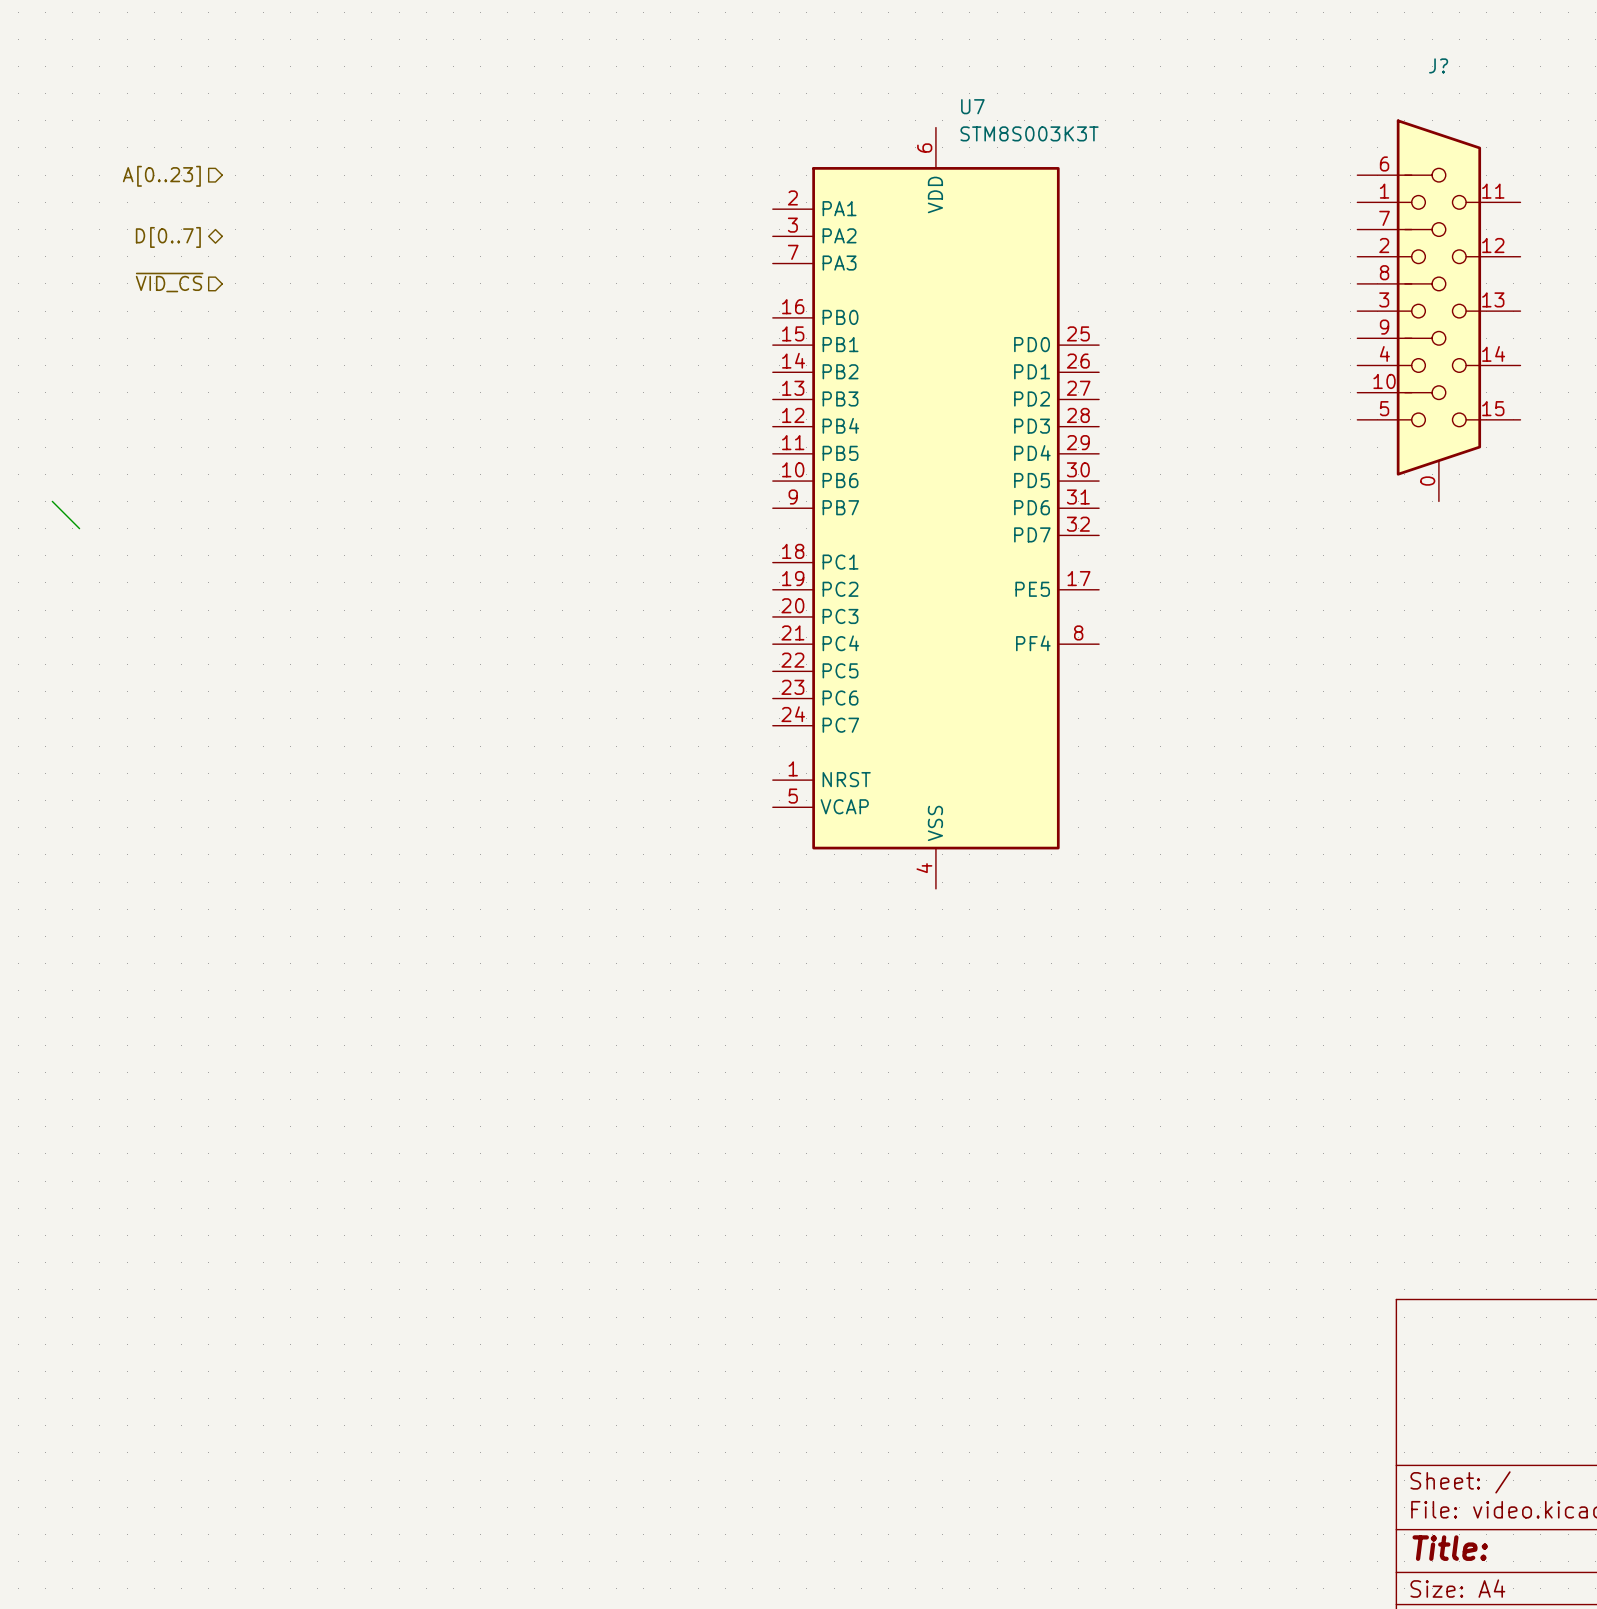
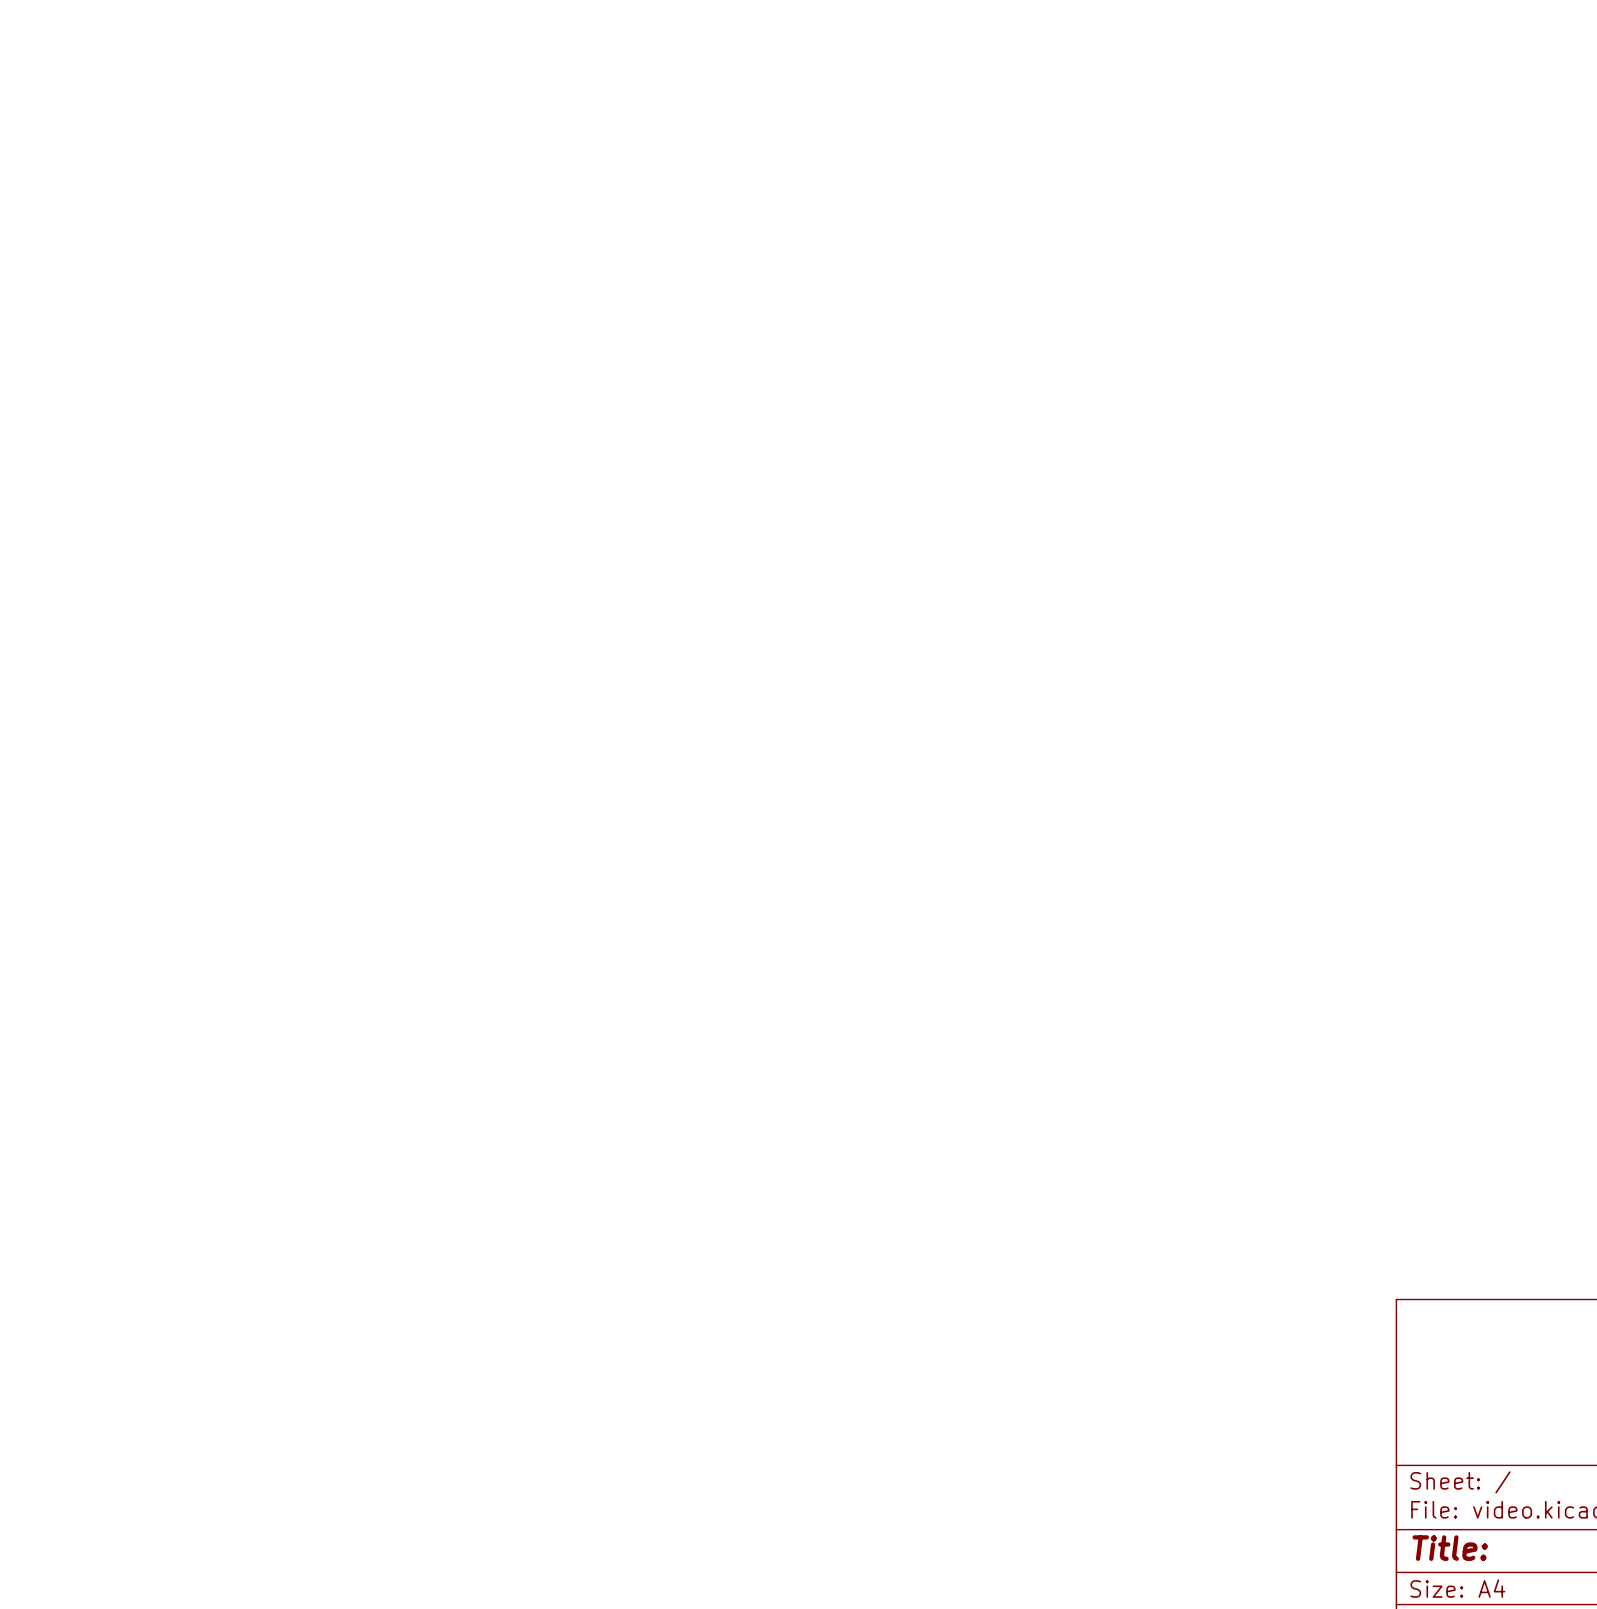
hierarchical label: A[0..23] (161, 176) -> none
hierarchical label: D[0..7] (168, 237) -> none
hierarchical label: ~{VID_CS} (169, 282) -> none
J?: (1438, 310) -> none
wire: (52, 501) (79, 528) -> none
U7: STM8S003K3T (935, 508) -> none

